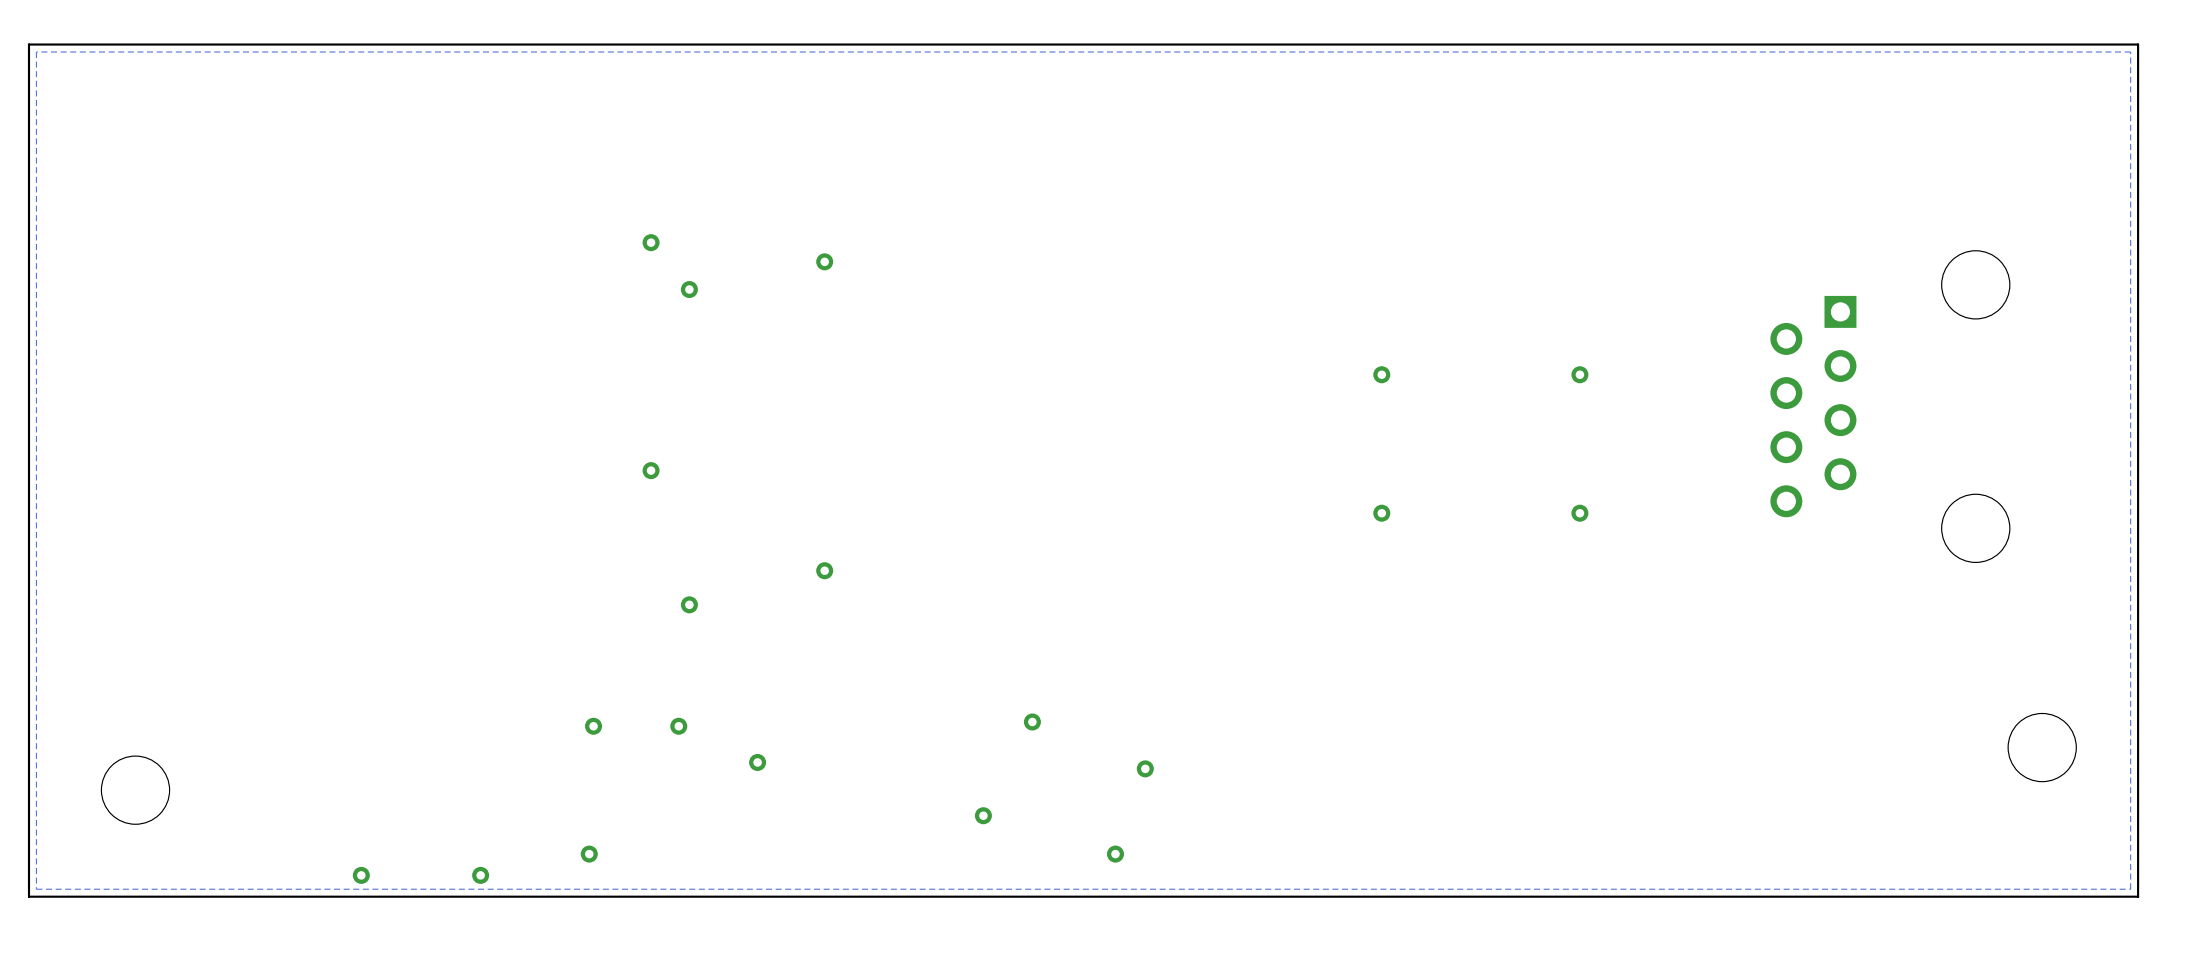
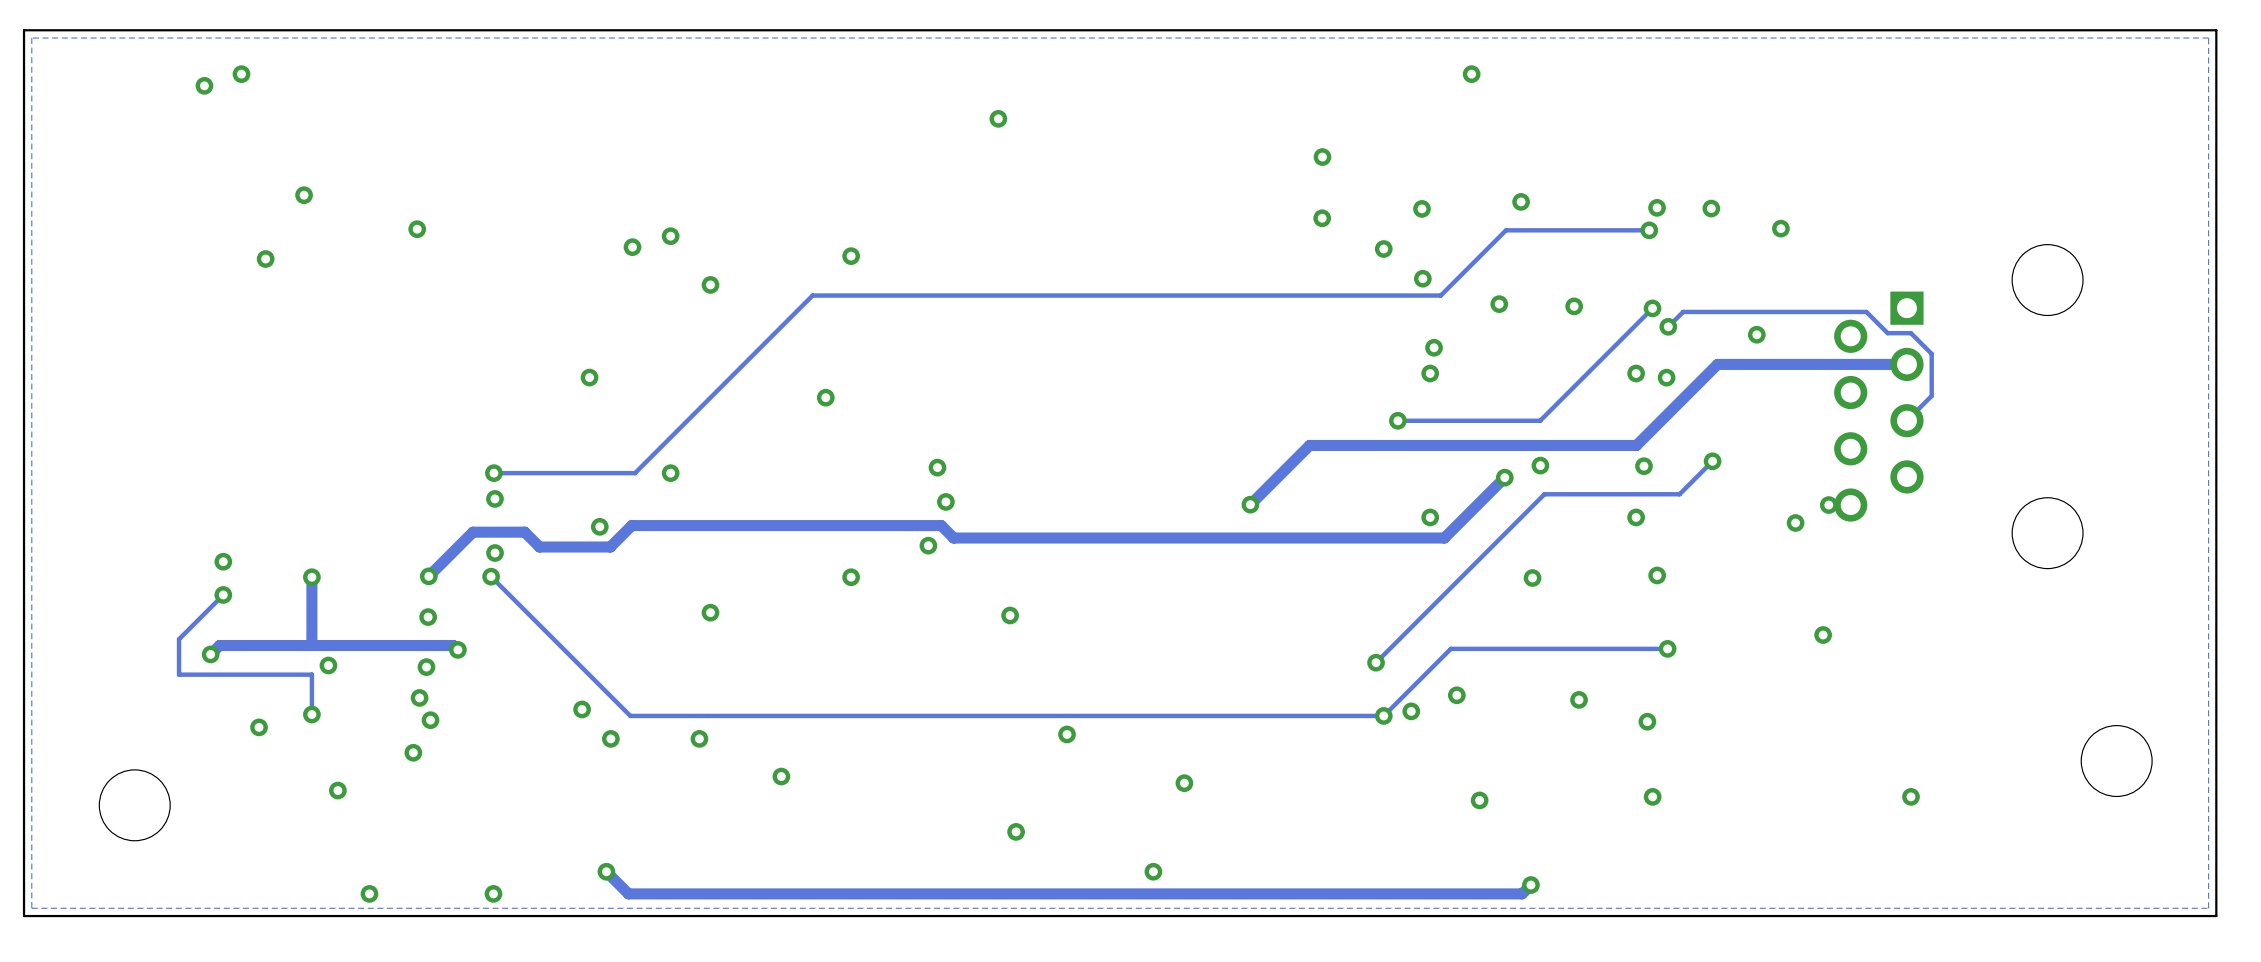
via: none -> (241, 74)
via: none -> (1471, 74)
via: none -> (204, 85)
via: none -> (998, 118)
via: none -> (1322, 157)
via: none -> (304, 195)
via: none -> (1521, 201)
via: none -> (1657, 207)
via: none -> (1421, 208)
via: none -> (1711, 208)
via: none -> (1322, 218)
via: none -> (417, 229)
via: none -> (1780, 228)
track: none -> (1649, 230) (1506, 230) (1440, 295) (812, 295) (635, 473) (493, 473)
via: none -> (1649, 230)
via: none -> (632, 247)
via: none -> (1383, 249)
via: none -> (265, 259)
via: none -> (1422, 278)
via: none -> (1499, 304)
via: none -> (1574, 306)
track: none -> (1652, 308) (1540, 420) (1397, 420)
via: none -> (1652, 308)
track: none -> (1668, 326) (1683, 311) (1866, 311) (1887, 333) (1910, 333) (1931, 353) (1931, 395) (1906, 420)
via: none -> (1668, 326)
via: none -> (1756, 334)
via: none -> (1434, 347)
track: none -> (1906, 364) (1717, 364) (1636, 445) (1309, 445) (1250, 504)
via: none -> (589, 377)
via: none -> (1666, 377)
via: none -> (825, 397)
via: none -> (1397, 420)
track: none -> (1712, 461) (1679, 494) (1544, 494) (1376, 662)
via: none -> (1712, 461)
via: none -> (1540, 465)
via: none -> (1643, 466)
via: none -> (937, 467)
via: none -> (493, 473)
track: none -> (1504, 477) (1444, 538) (953, 538) (941, 525) (631, 525) (610, 547) (539, 547) (524, 532) (472, 532) (428, 576)
via: none -> (1504, 477)
via: none -> (494, 498)
via: none -> (945, 501)
via: none -> (1250, 504)
via: none -> (1828, 505)
via: none -> (1795, 522)
via: none -> (599, 526)
via: none -> (928, 545)
via: none -> (495, 553)
via: none -> (223, 561)
via: none -> (428, 576)
via: none -> (1657, 575)
track: none -> (311, 577) (311, 645)
via: none -> (311, 577)
track: none -> (491, 576) (630, 715) (1383, 715) (1450, 648) (1667, 648)
via: none -> (491, 576)
via: none -> (1532, 578)
track: none -> (223, 594) (179, 639) (179, 674) (311, 674) (311, 714)
via: none -> (223, 594)
via: none -> (1010, 615)
via: none -> (428, 617)
via: none -> (1823, 635)
via: none -> (1667, 648)
track: none -> (457, 649) (453, 645) (219, 645) (210, 654)
via: none -> (457, 649)
via: none -> (210, 654)
via: none -> (1376, 662)
via: none -> (328, 665)
via: none -> (426, 667)
via: none -> (1456, 695)
via: none -> (419, 697)
via: none -> (1579, 699)
via: none -> (582, 709)
via: none -> (1411, 711)
via: none -> (311, 714)
via: none -> (1383, 715)
via: none -> (430, 720)
via: none -> (1647, 721)
via: none -> (259, 727)
via: none -> (413, 752)
via: none -> (337, 790)
via: none -> (1652, 796)
via: none -> (1910, 796)
via: none -> (1479, 800)
track: none -> (606, 871) (628, 893) (1522, 893) (1530, 885)
via: none -> (1530, 885)

